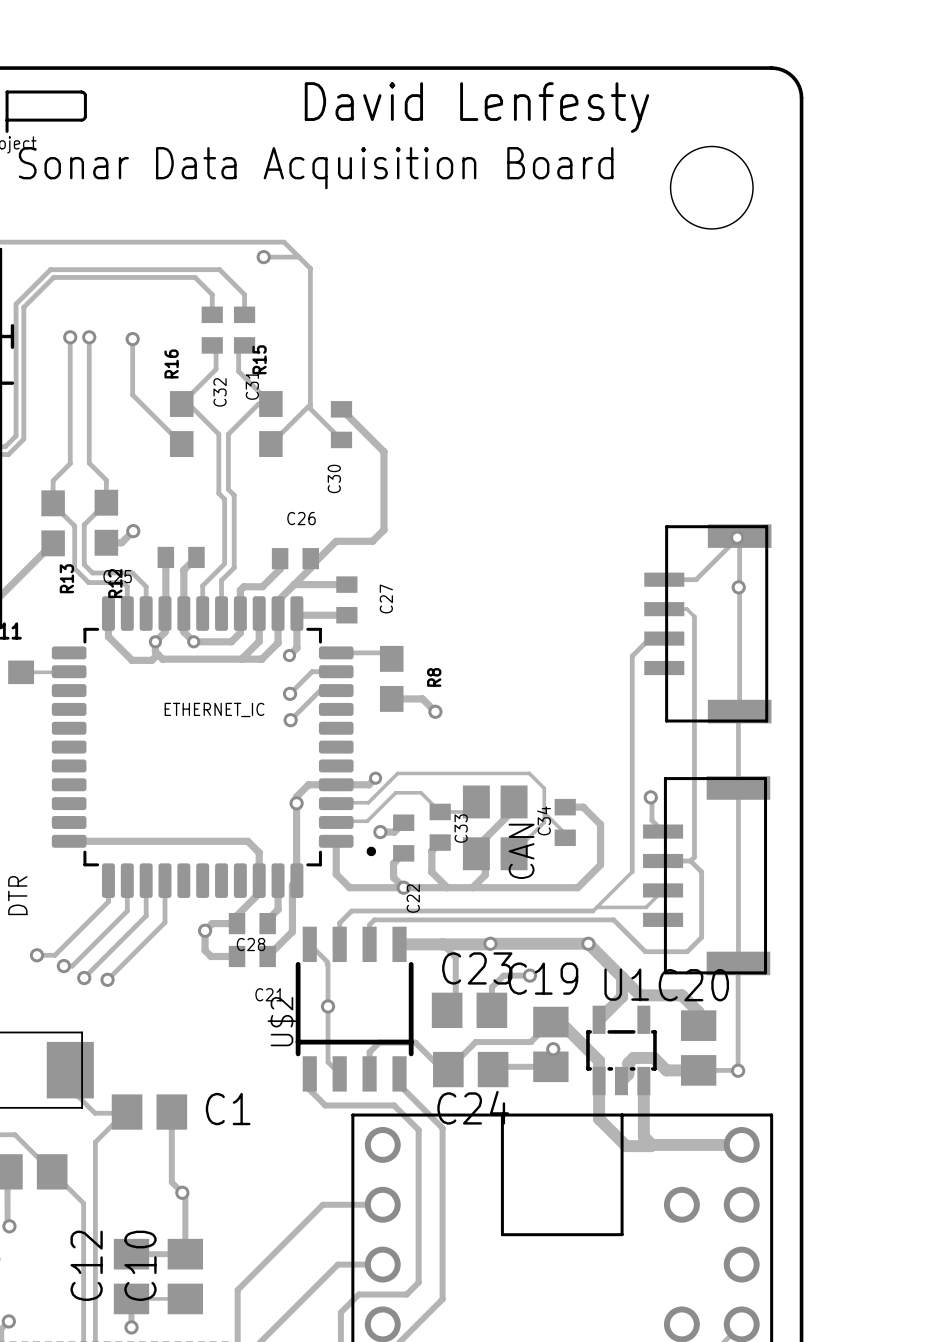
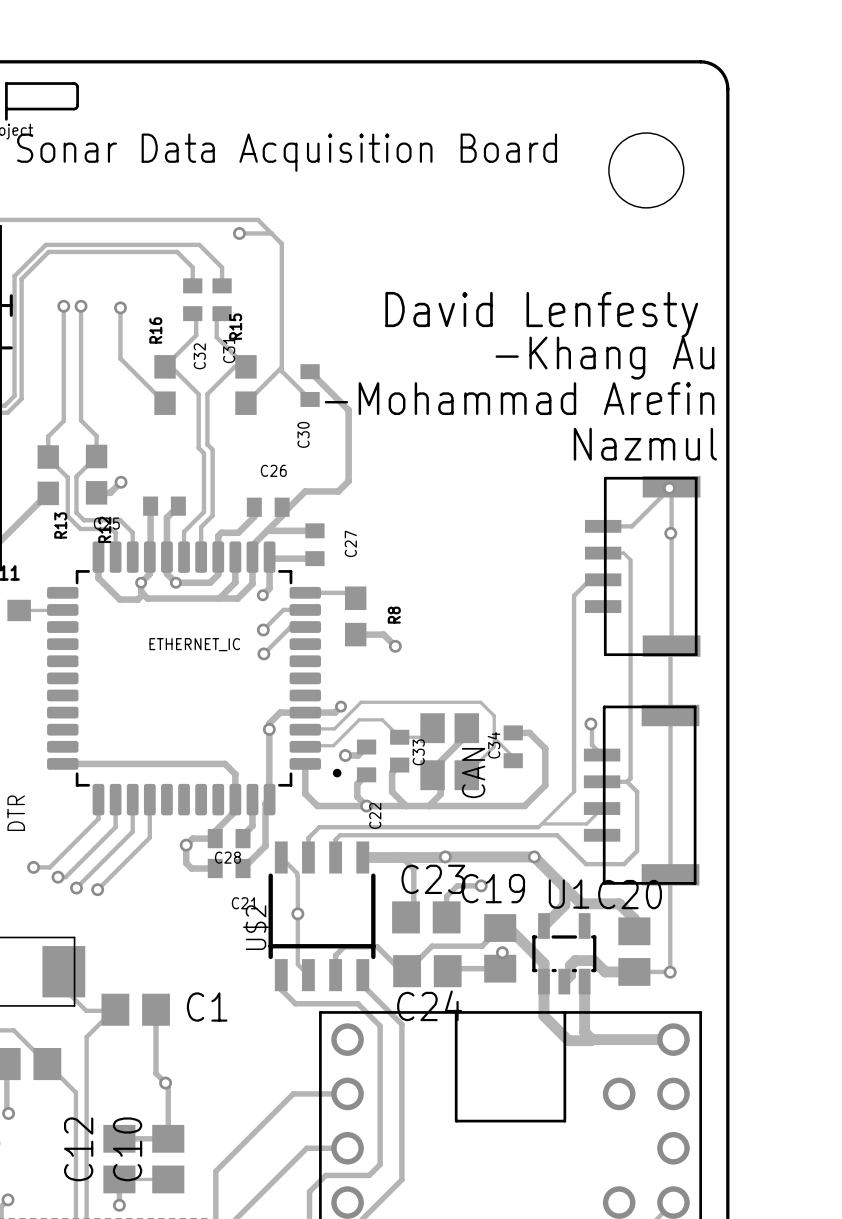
text position: David Lenfesty (476, 107) -> David Lenfesty (541, 314)
text: none -> -Khang Au (604, 358)
text: none -> -Mohammad Arefin (519, 398)
text: none -> Nazmul (645, 444)

